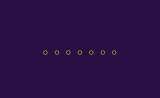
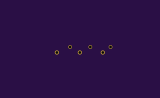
via: none -> (70, 46)
via: none -> (90, 46)
via: none -> (110, 46)
via: (45, 52) -> none
via: (68, 52) -> none
via: (91, 52) -> none
via: (114, 52) -> none

